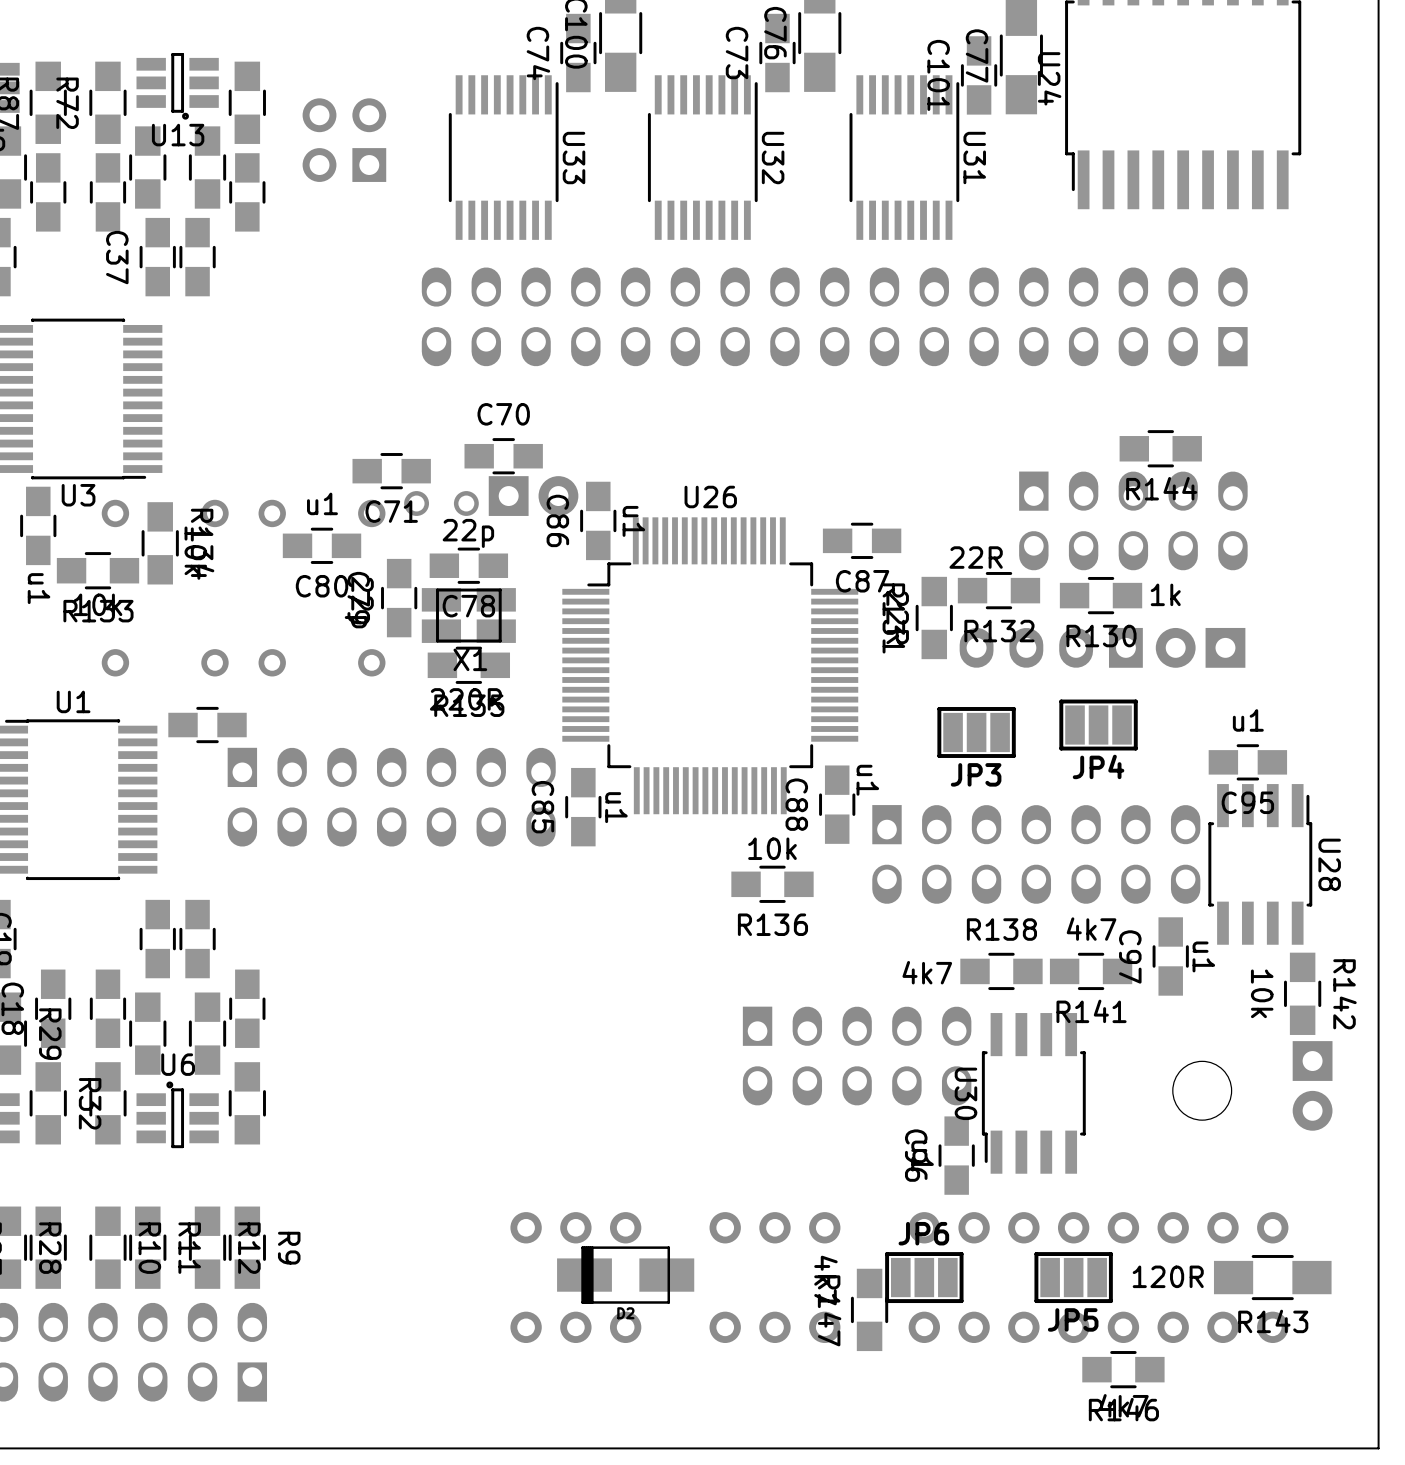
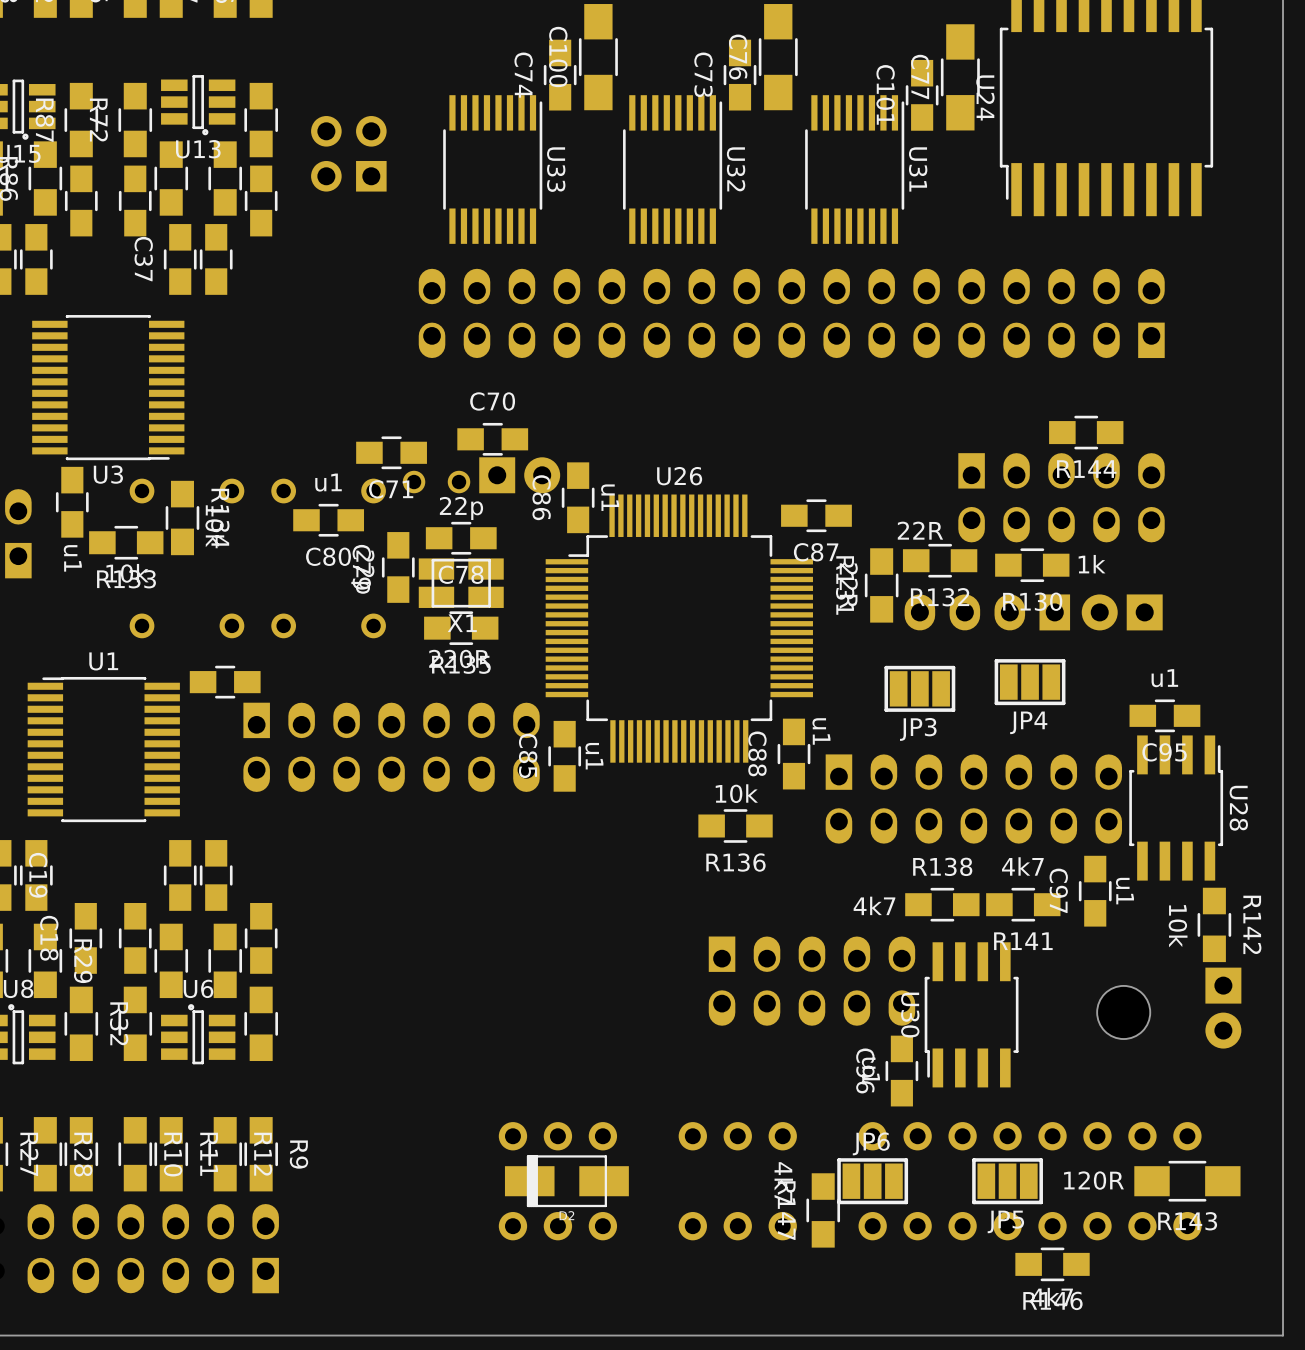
D2 position: (625, 1275) -> (566, 1181)

